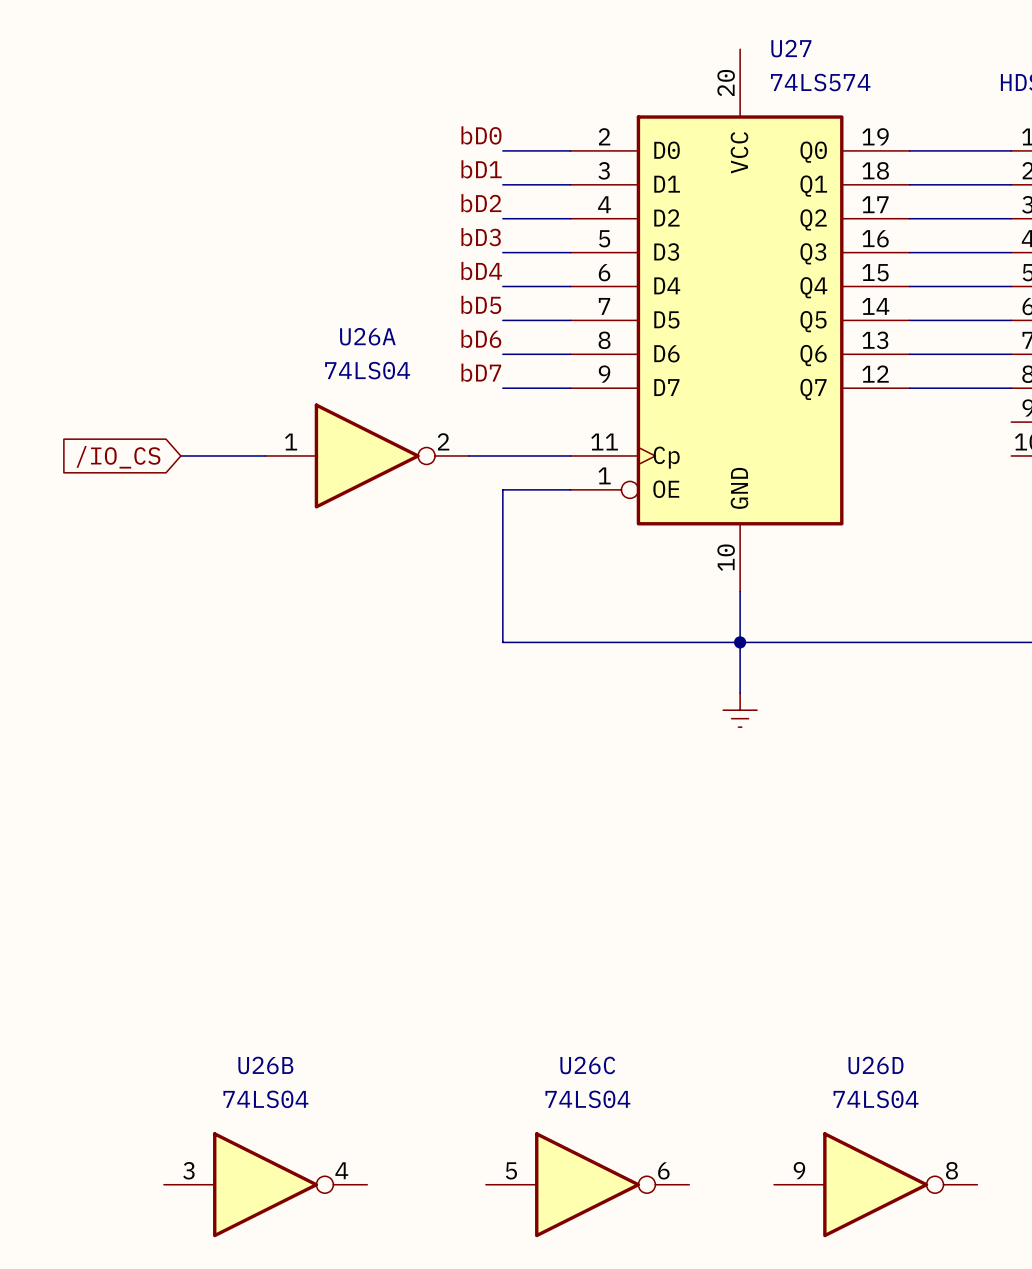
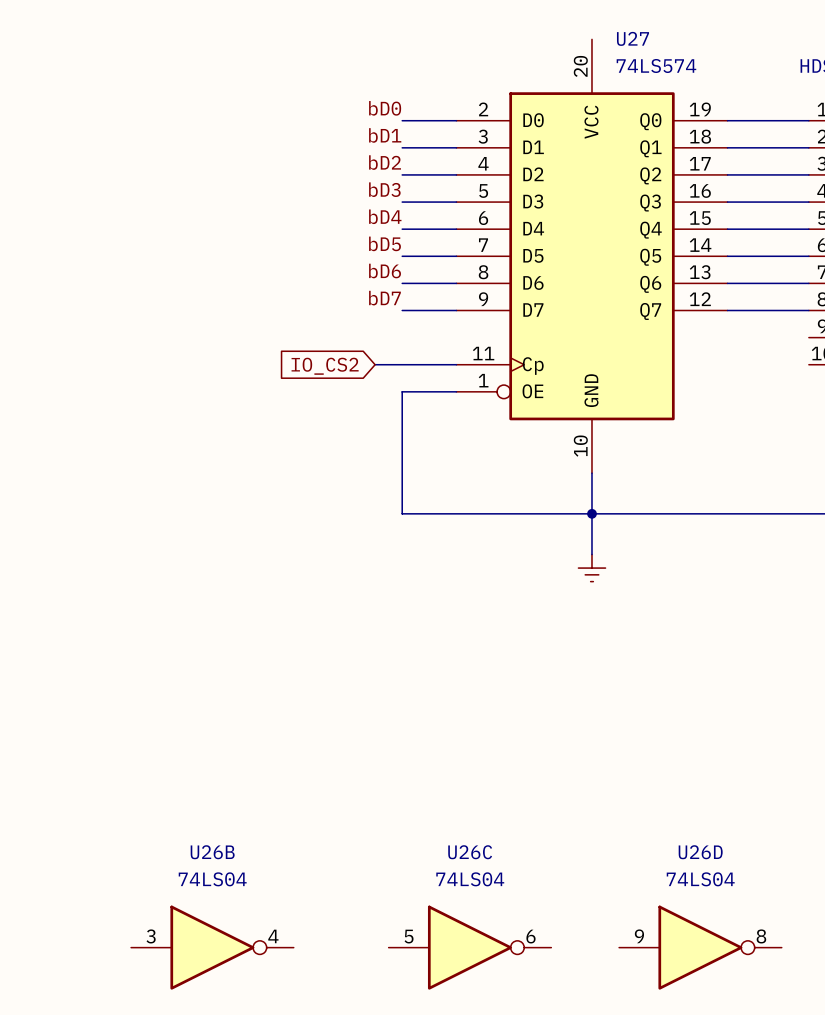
wire: (180, 455) (265, 455) -> none
U26A: 74LS04 (367, 455) -> none
global label: /IO_CS (118, 457) -> none
global label: none -> IO_CS2 (325, 366)

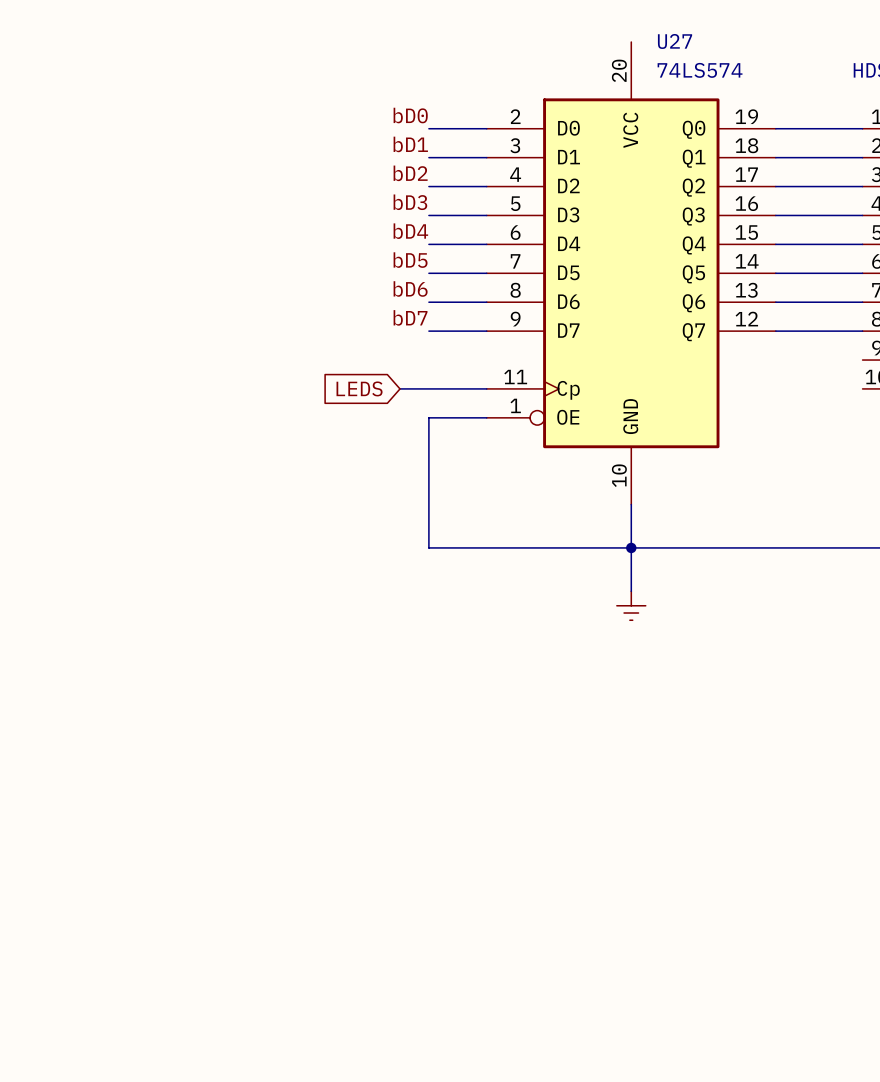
global label: IO_CS2 (325, 366) -> LEDS (359, 388)
U26B: 74LS04 (212, 947) -> none
U26C: 74LS04 (469, 947) -> none
U26D: 74LS04 (700, 947) -> none

